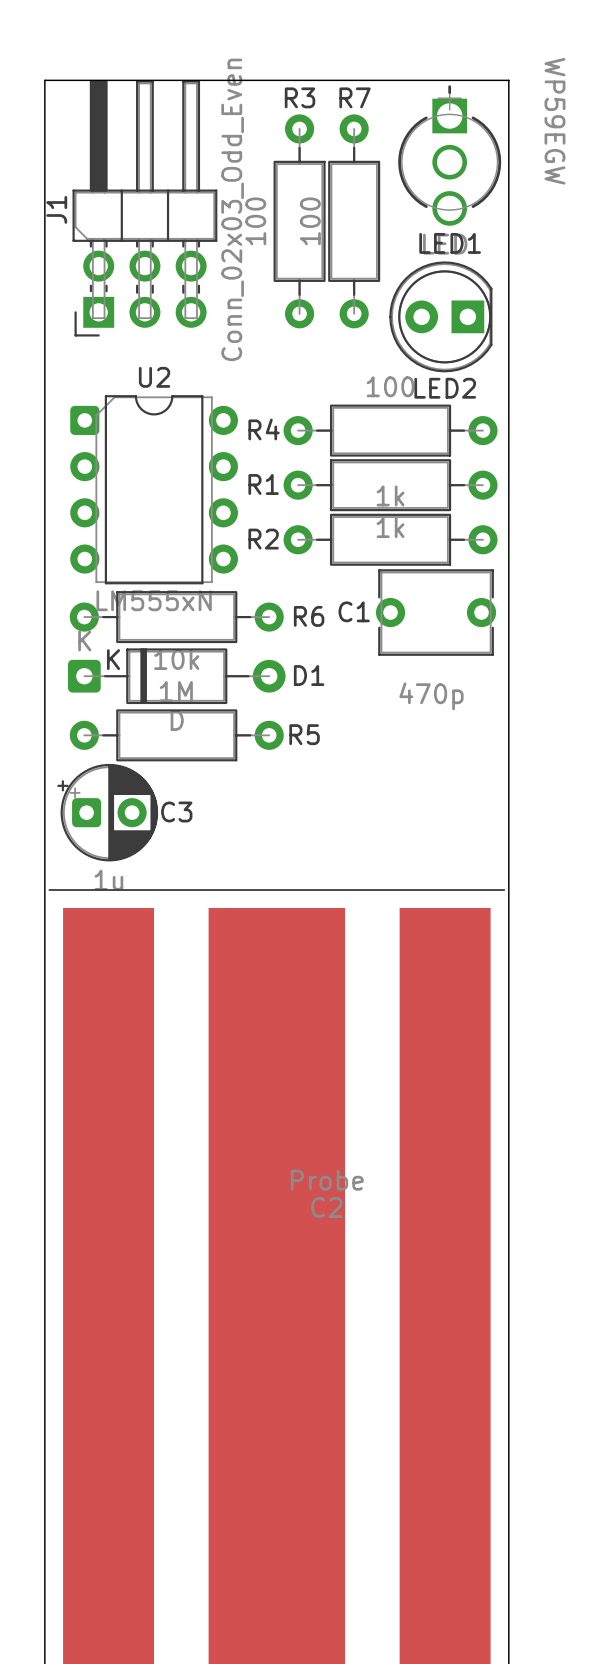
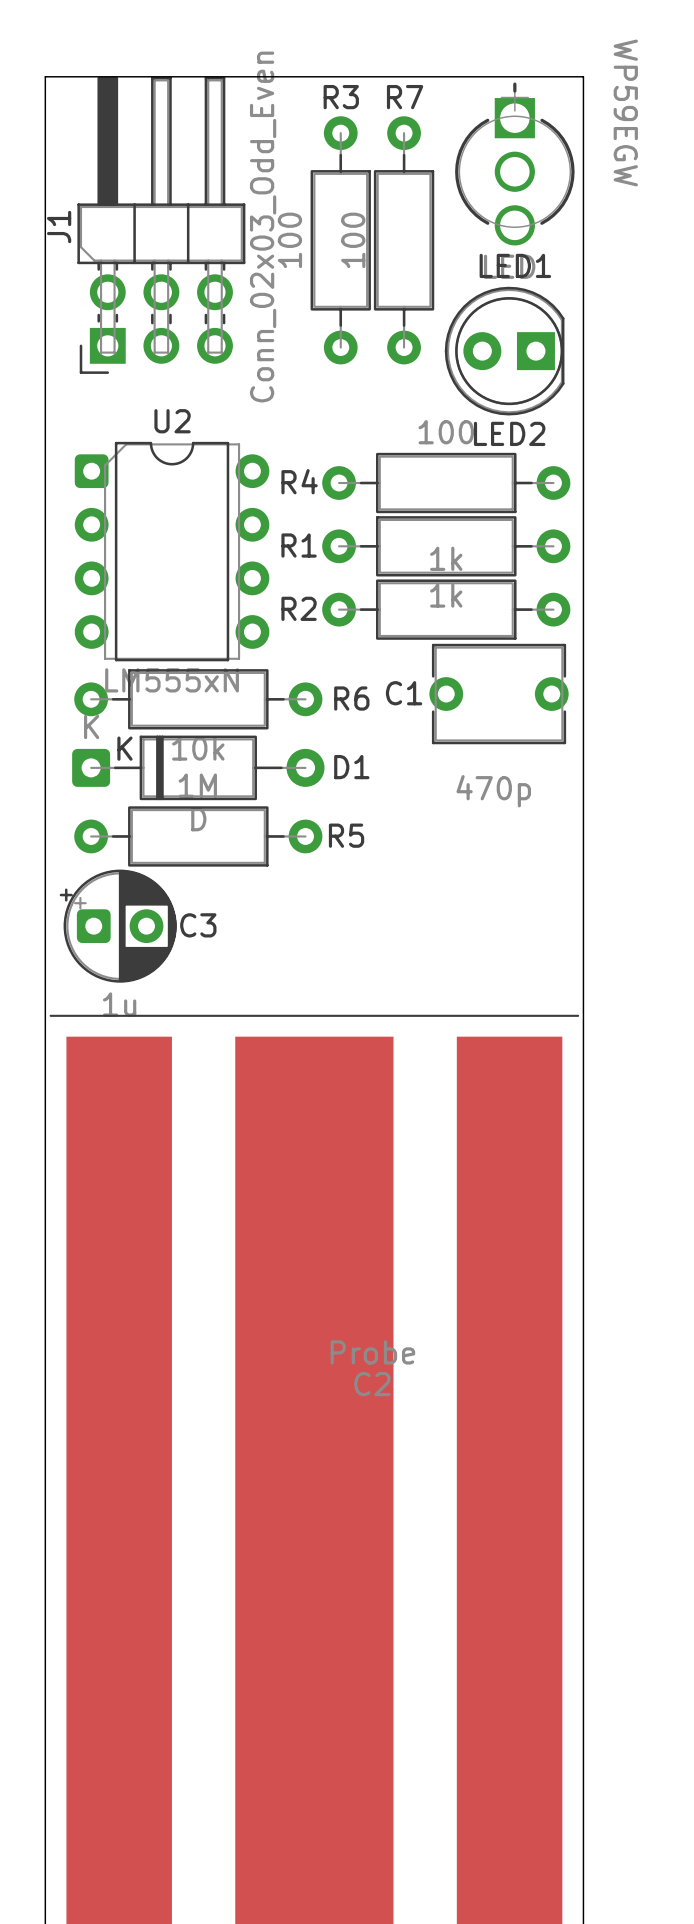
LED1 value position: WP59EGW (554, 121) -> WP59EGW (625, 112)

